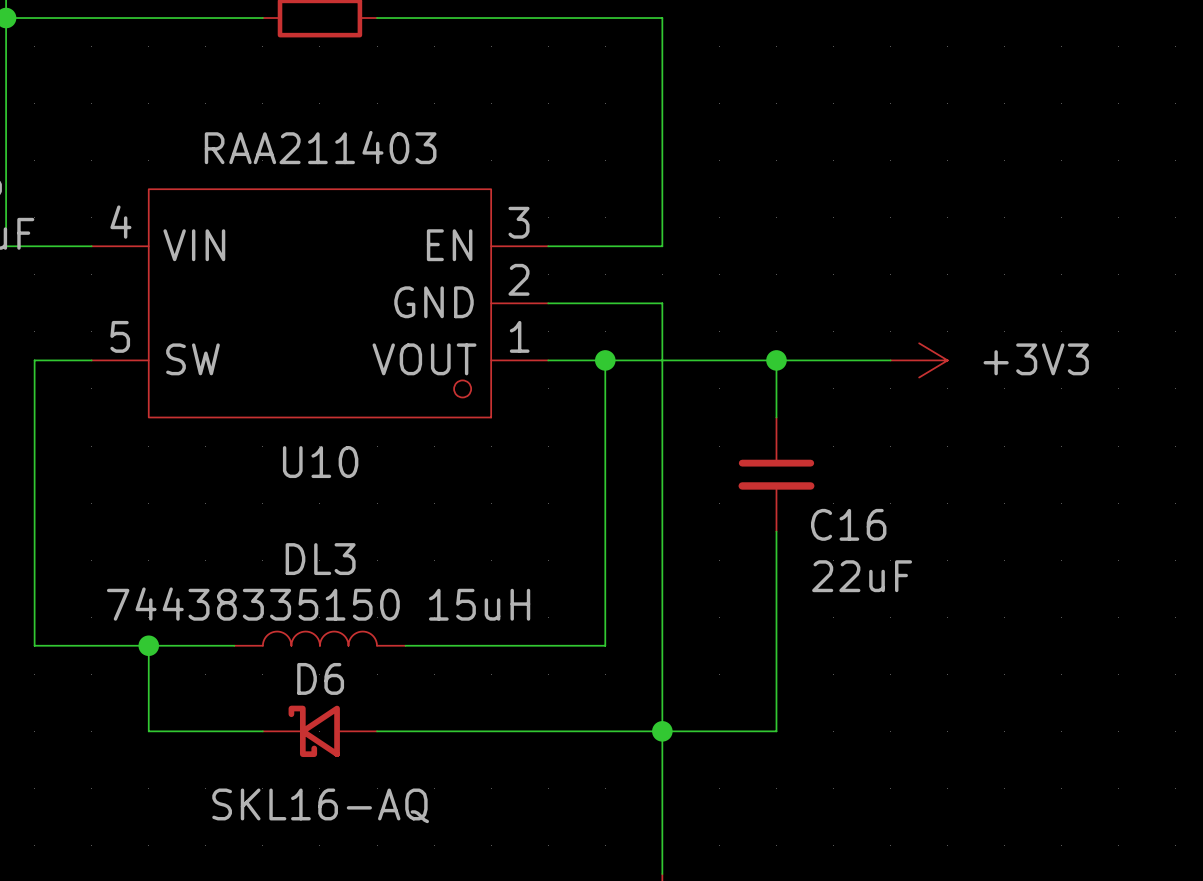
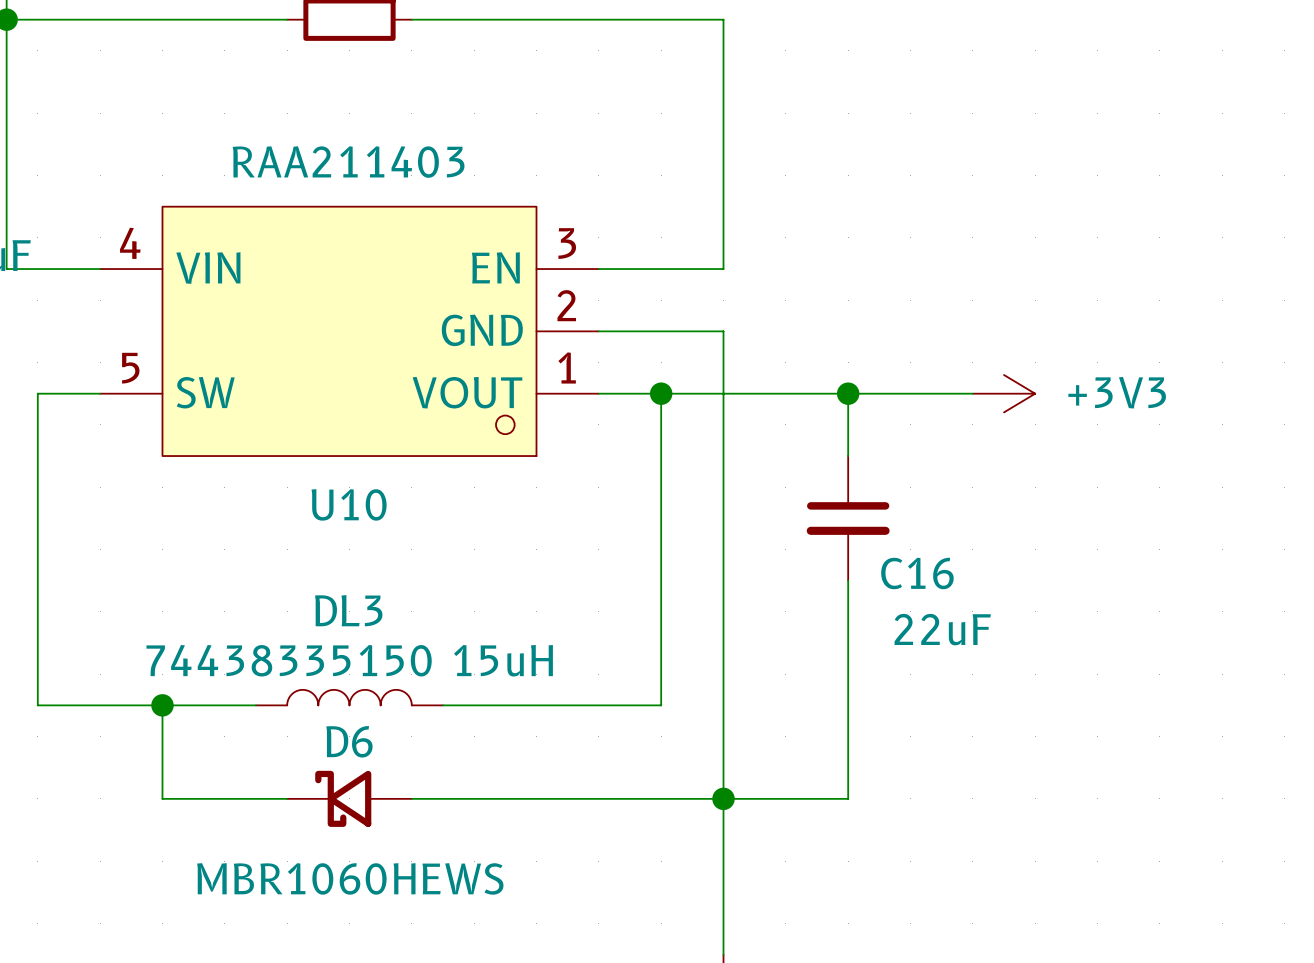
D6 text: SKL16-AQ (320, 805) -> MBR1060HEWS (350, 878)

